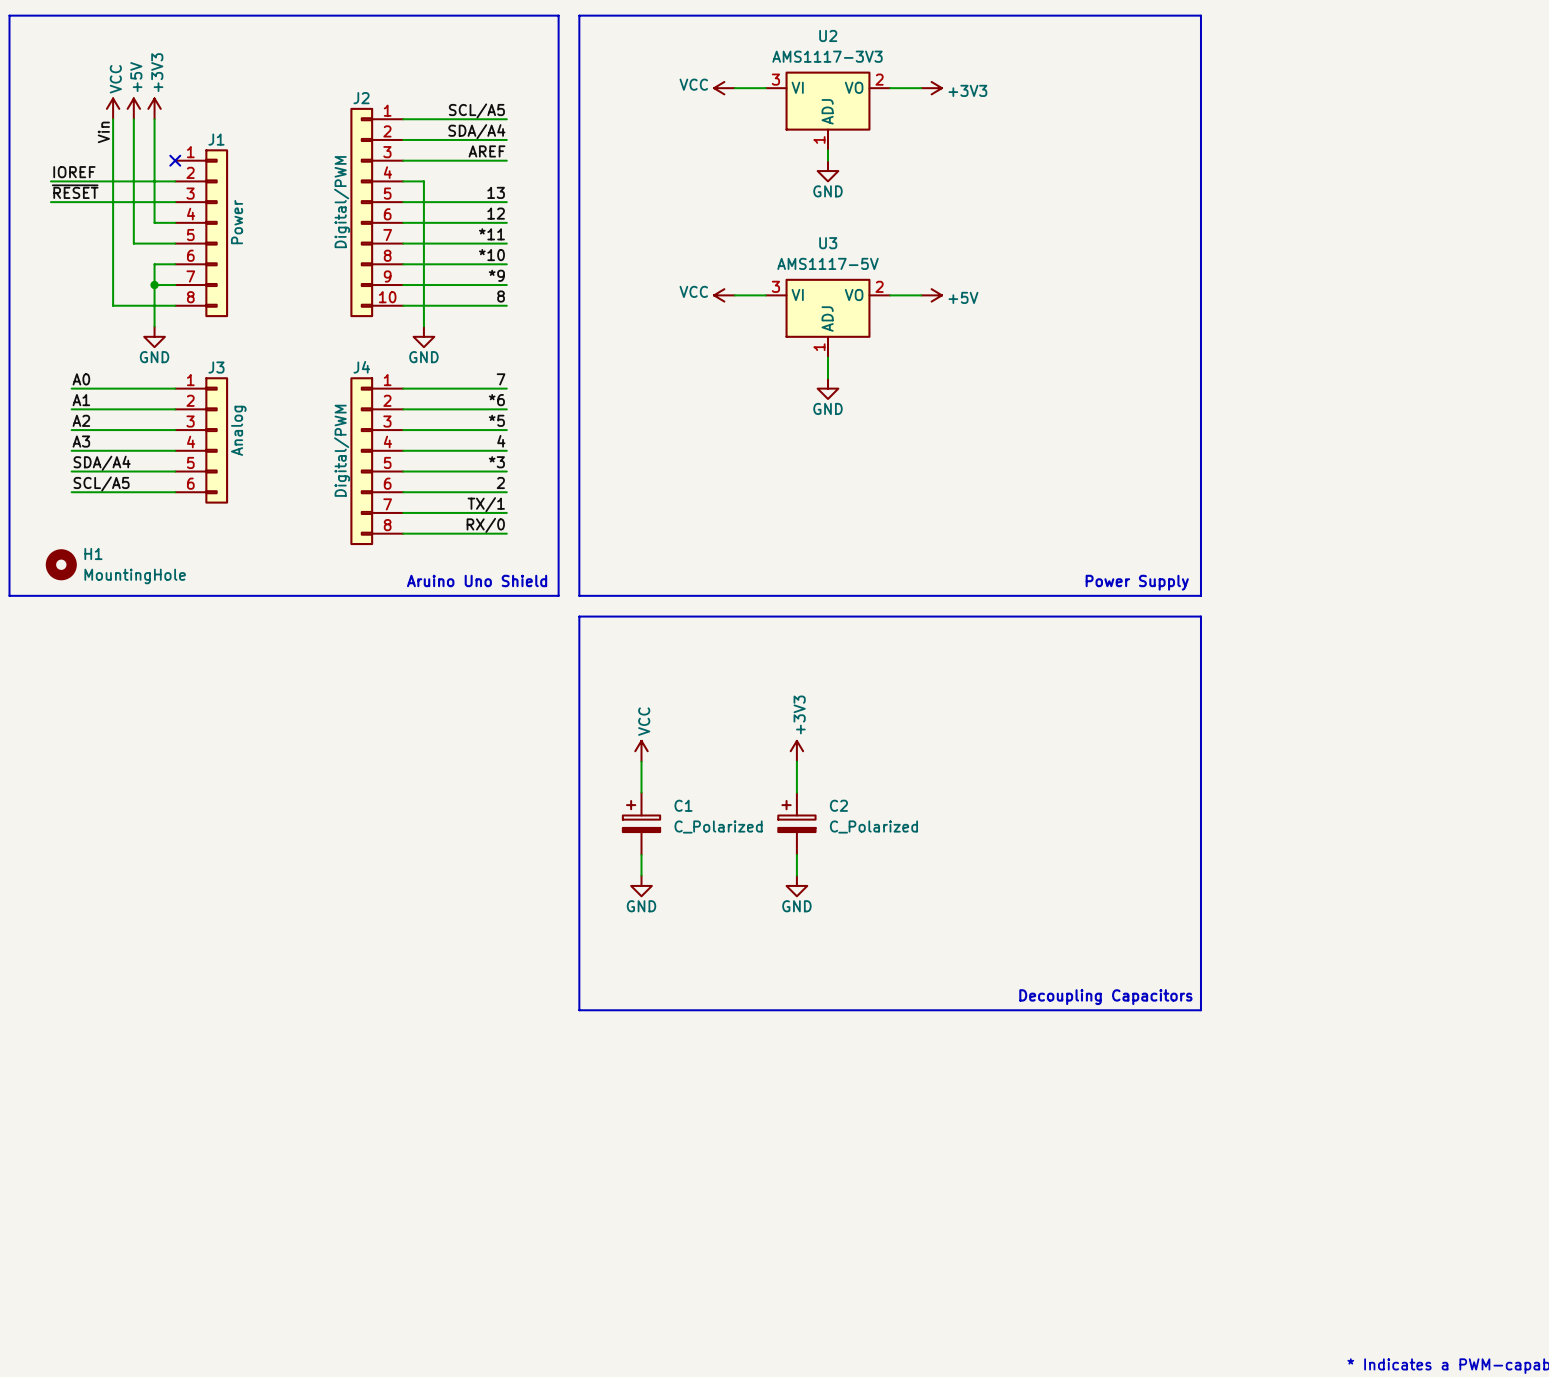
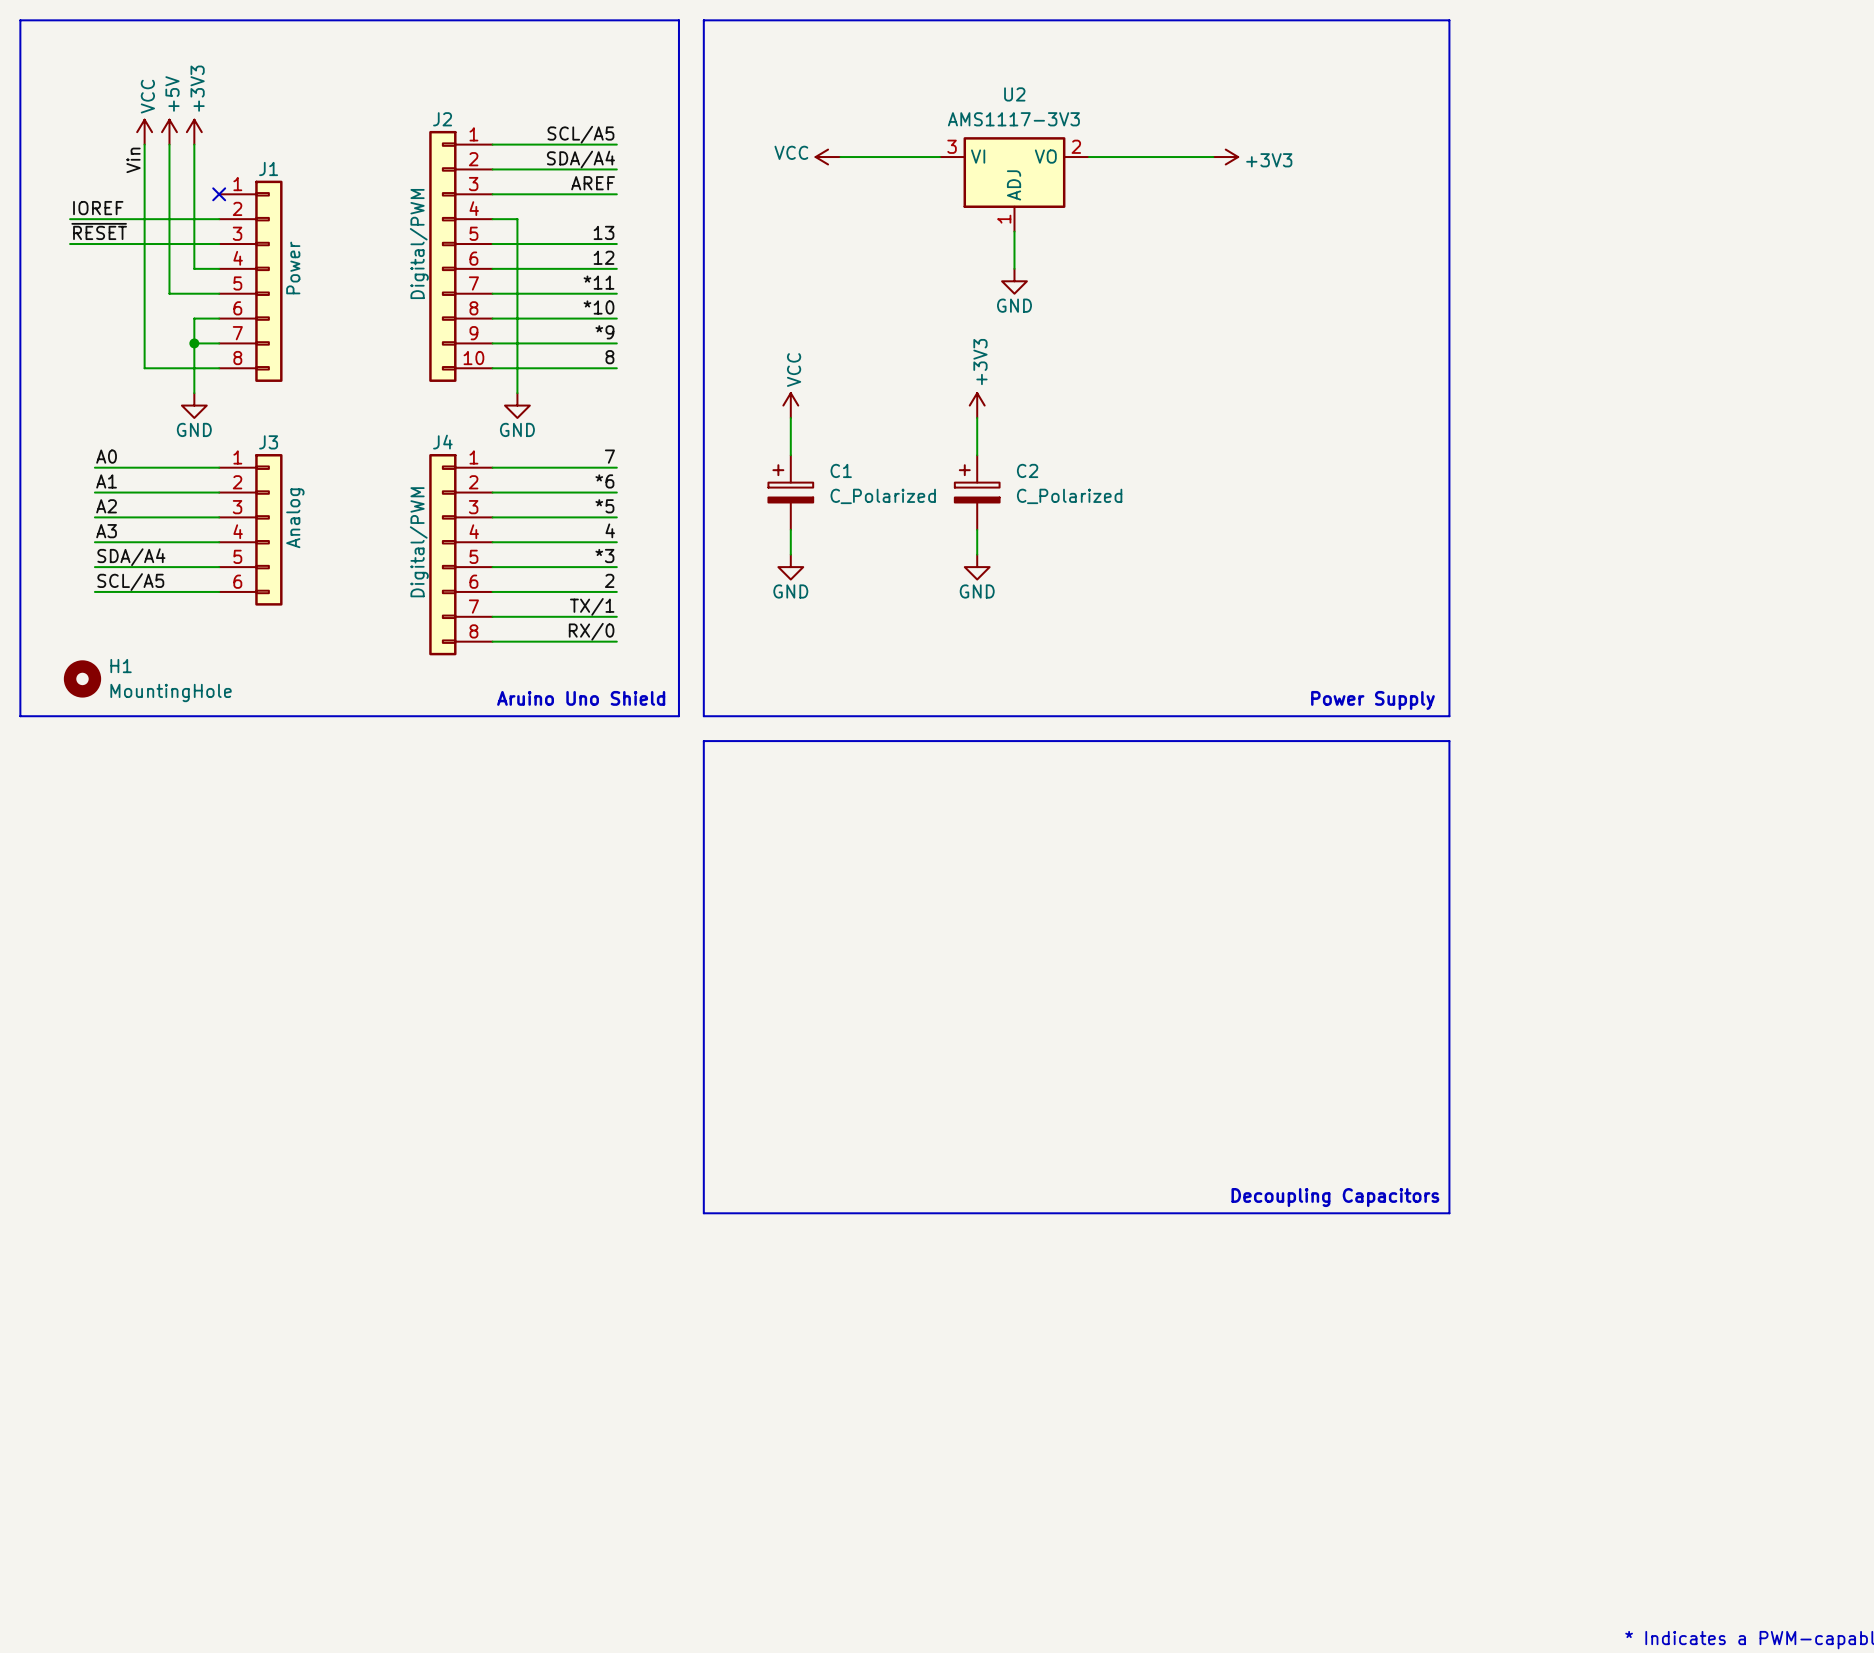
power symbol position: VCC (724, 88) -> VCC (828, 157)
wire: (734, 88) (765, 88) -> none
wire: (890, 88) (921, 88) -> none
power symbol position: +3V3 (931, 88) -> +3V3 (1225, 157)
U2 position: (827, 110) -> (1014, 184)
wire: none -> (840, 157) (939, 157)
wire: none -> (1089, 157) (1213, 157)
power symbol position: GND (827, 171) -> GND (1014, 281)
wire: none -> (1014, 231) (1014, 268)
power symbol rotation: 0° (724, 295) -> 90° clockwise (790, 405)
power symbol position: VCC (724, 295) -> VCC (790, 405)
wire: (734, 295) (765, 295) -> none
wire: (890, 295) (921, 295) -> none
power symbol: +5V (931, 295) -> none
U3: AMS1117-5V (827, 318) -> none
power symbol: none -> +3V3 (977, 405)
wire: none -> (790, 417) (790, 455)
wire: none -> (977, 417) (977, 455)
wire: (827, 357) (827, 378) -> (977, 529) (977, 554)
power symbol: GND (827, 388) -> none
wire: none -> (790, 529) (790, 554)
power symbol: none -> GND (790, 567)
power symbol: none -> GND (977, 567)
power symbol: VCC (641, 751) -> none
power symbol: +3V3 (796, 751) -> none
wire: (641, 761) (641, 792) -> none
wire: (796, 761) (796, 792) -> none
C1 position: (641, 823) -> (790, 492)
C2 position: (796, 823) -> (977, 492)
wire: (641, 854) (641, 875) -> none
wire: (796, 854) (796, 875) -> none
power symbol: GND (641, 885) -> none
power symbol: GND (796, 885) -> none

